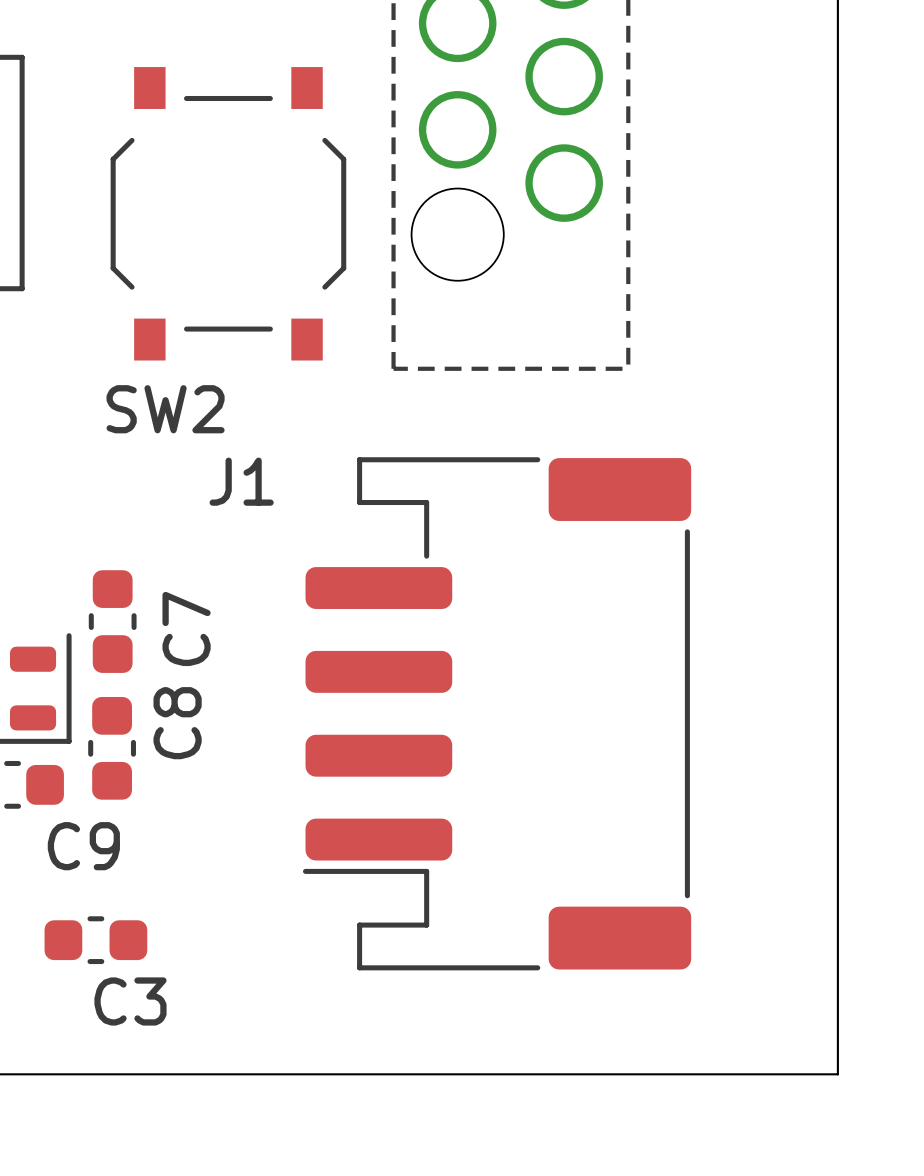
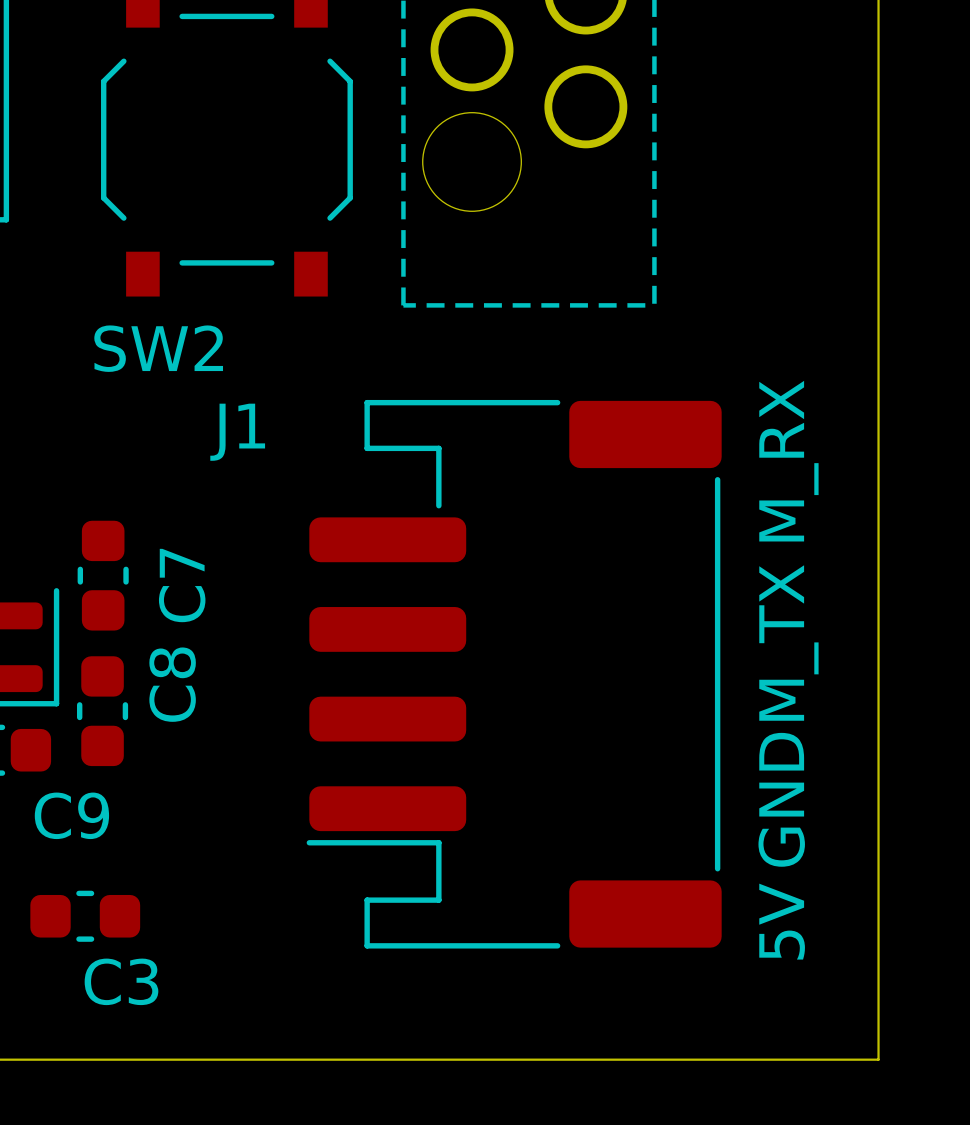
text: none -> M_RX (788, 461)
text: none -> M_TX (788, 643)
text: none -> GND (781, 799)
text: none -> 5V (782, 921)

